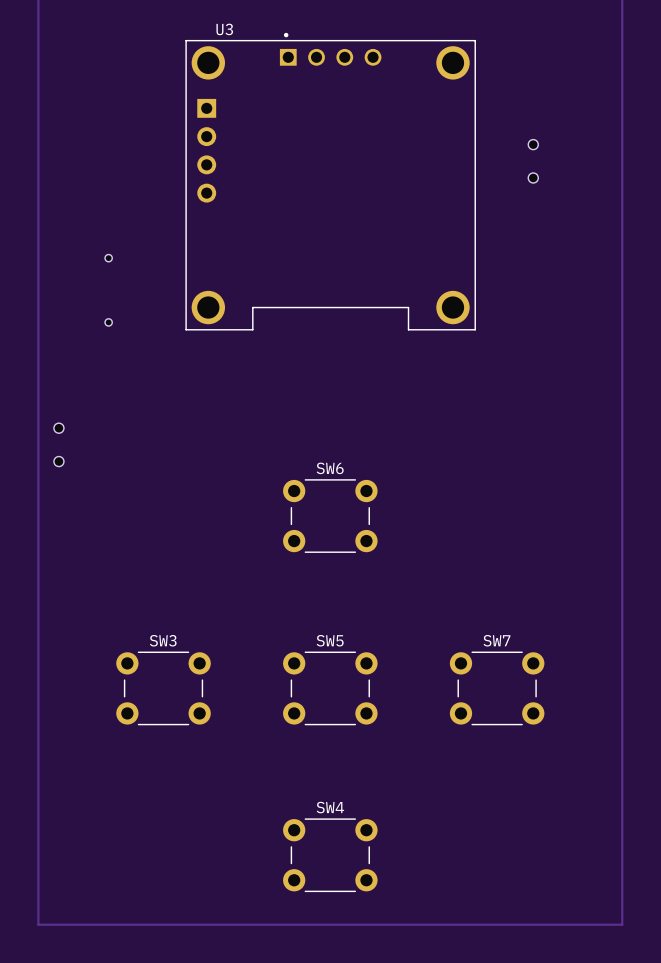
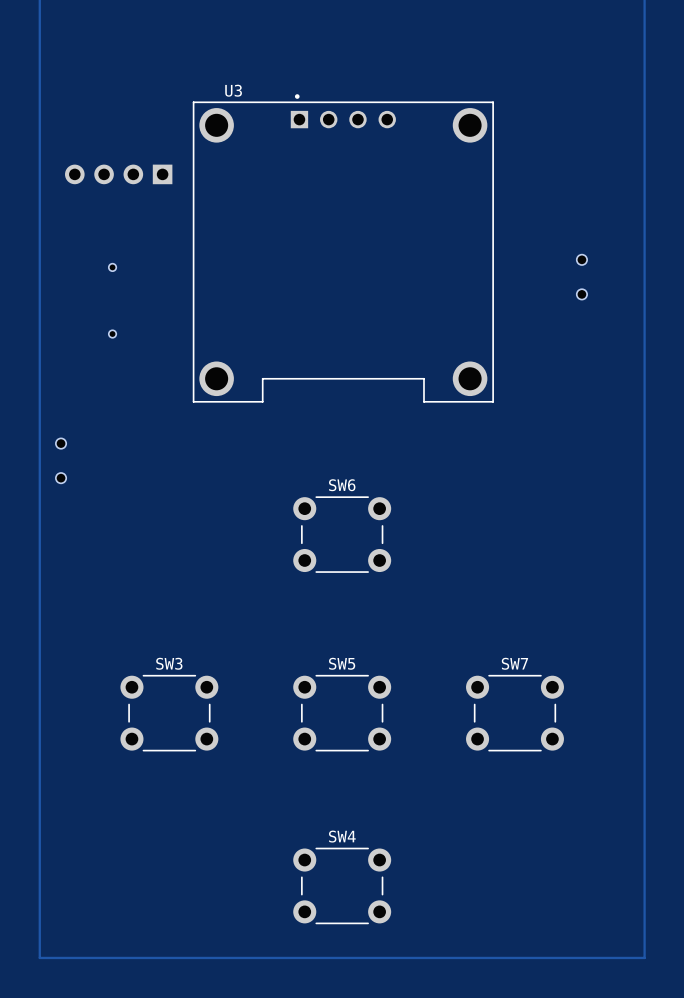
part rotation: 0° (206, 150) -> 90° clockwise (118, 174)
part position: (206, 150) -> (118, 174)
part position: (533, 161) -> (581, 277)
U3 position: (330, 181) -> (343, 248)

